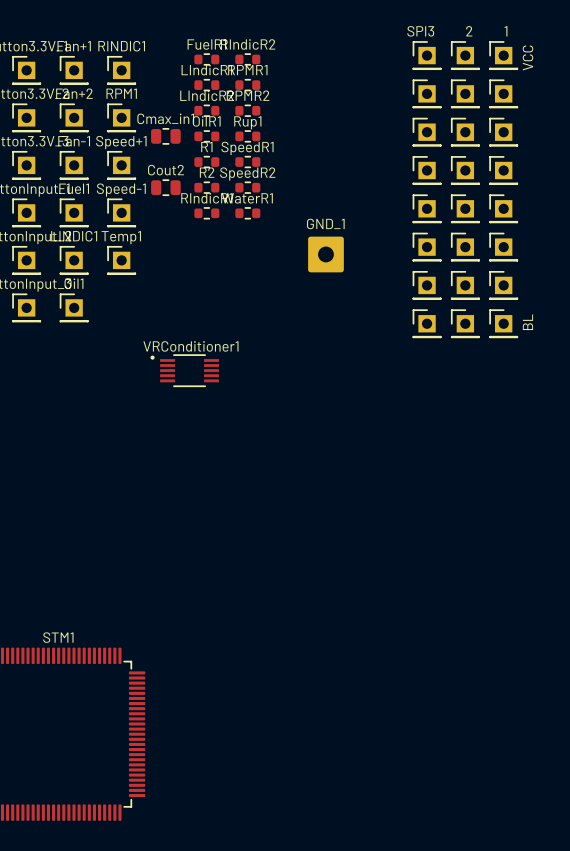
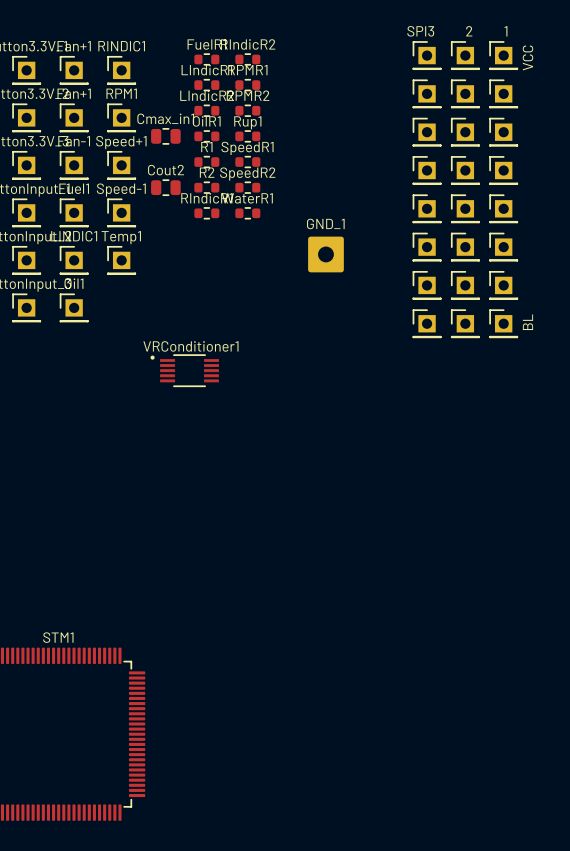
Fan+2 name: Fan+2 (74, 93) -> Fan+1 (74, 93)

